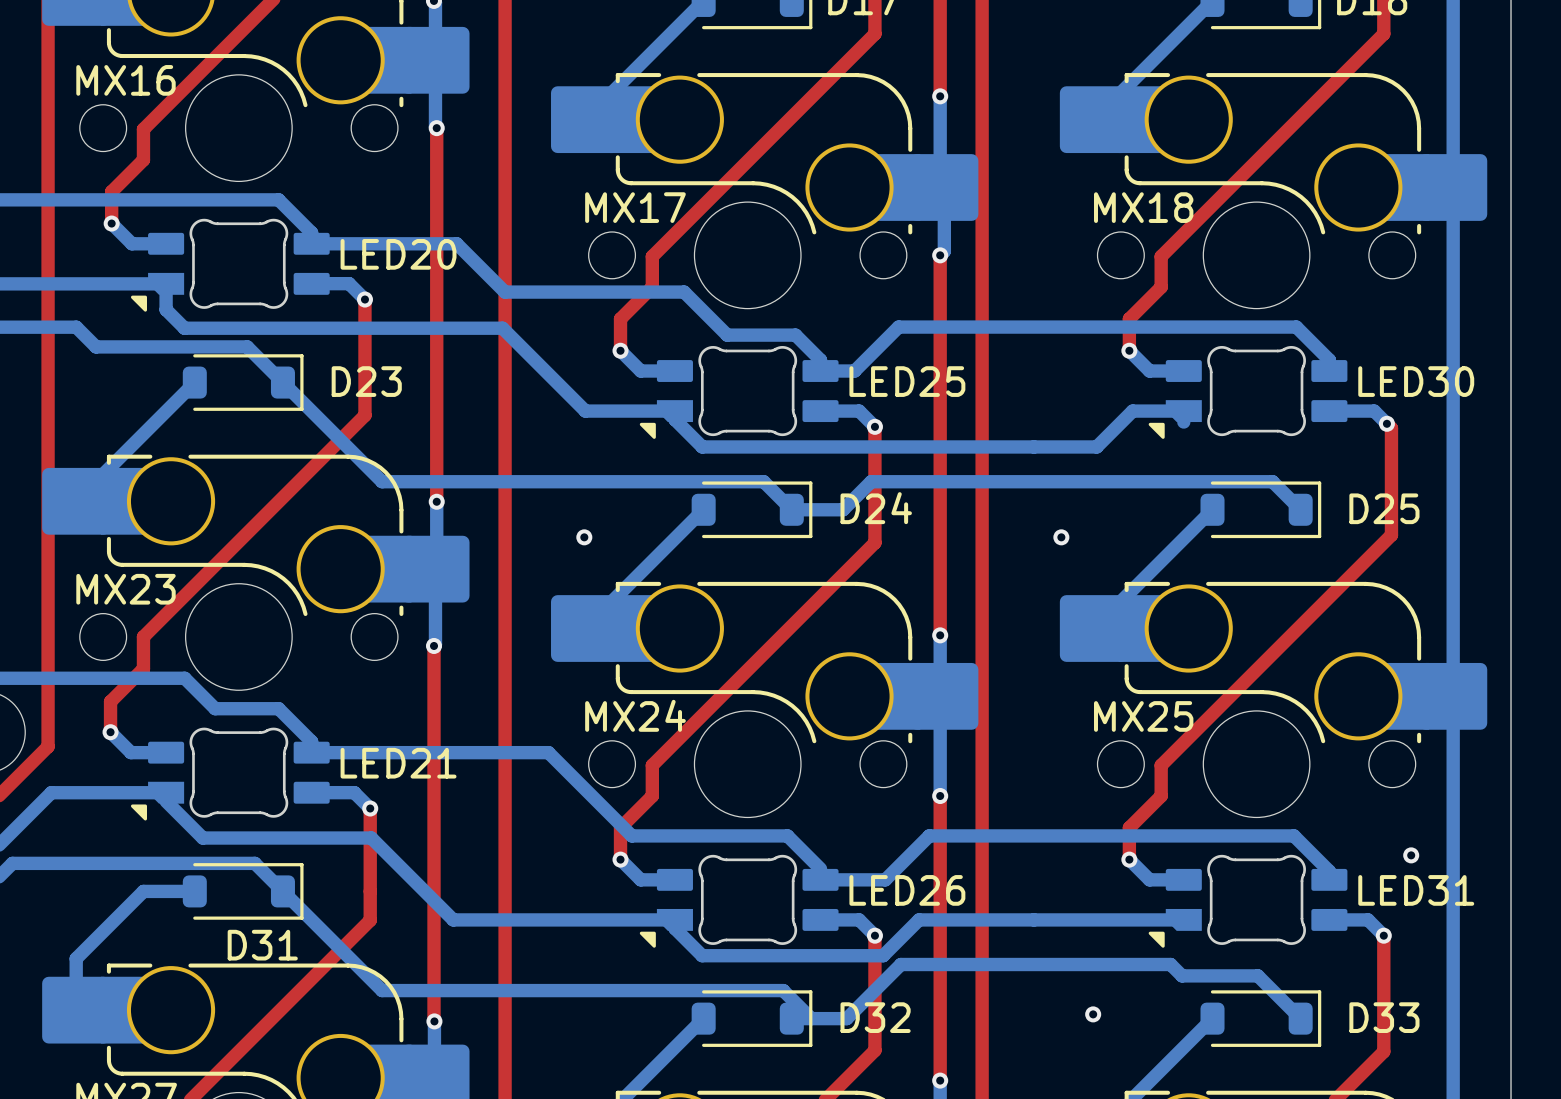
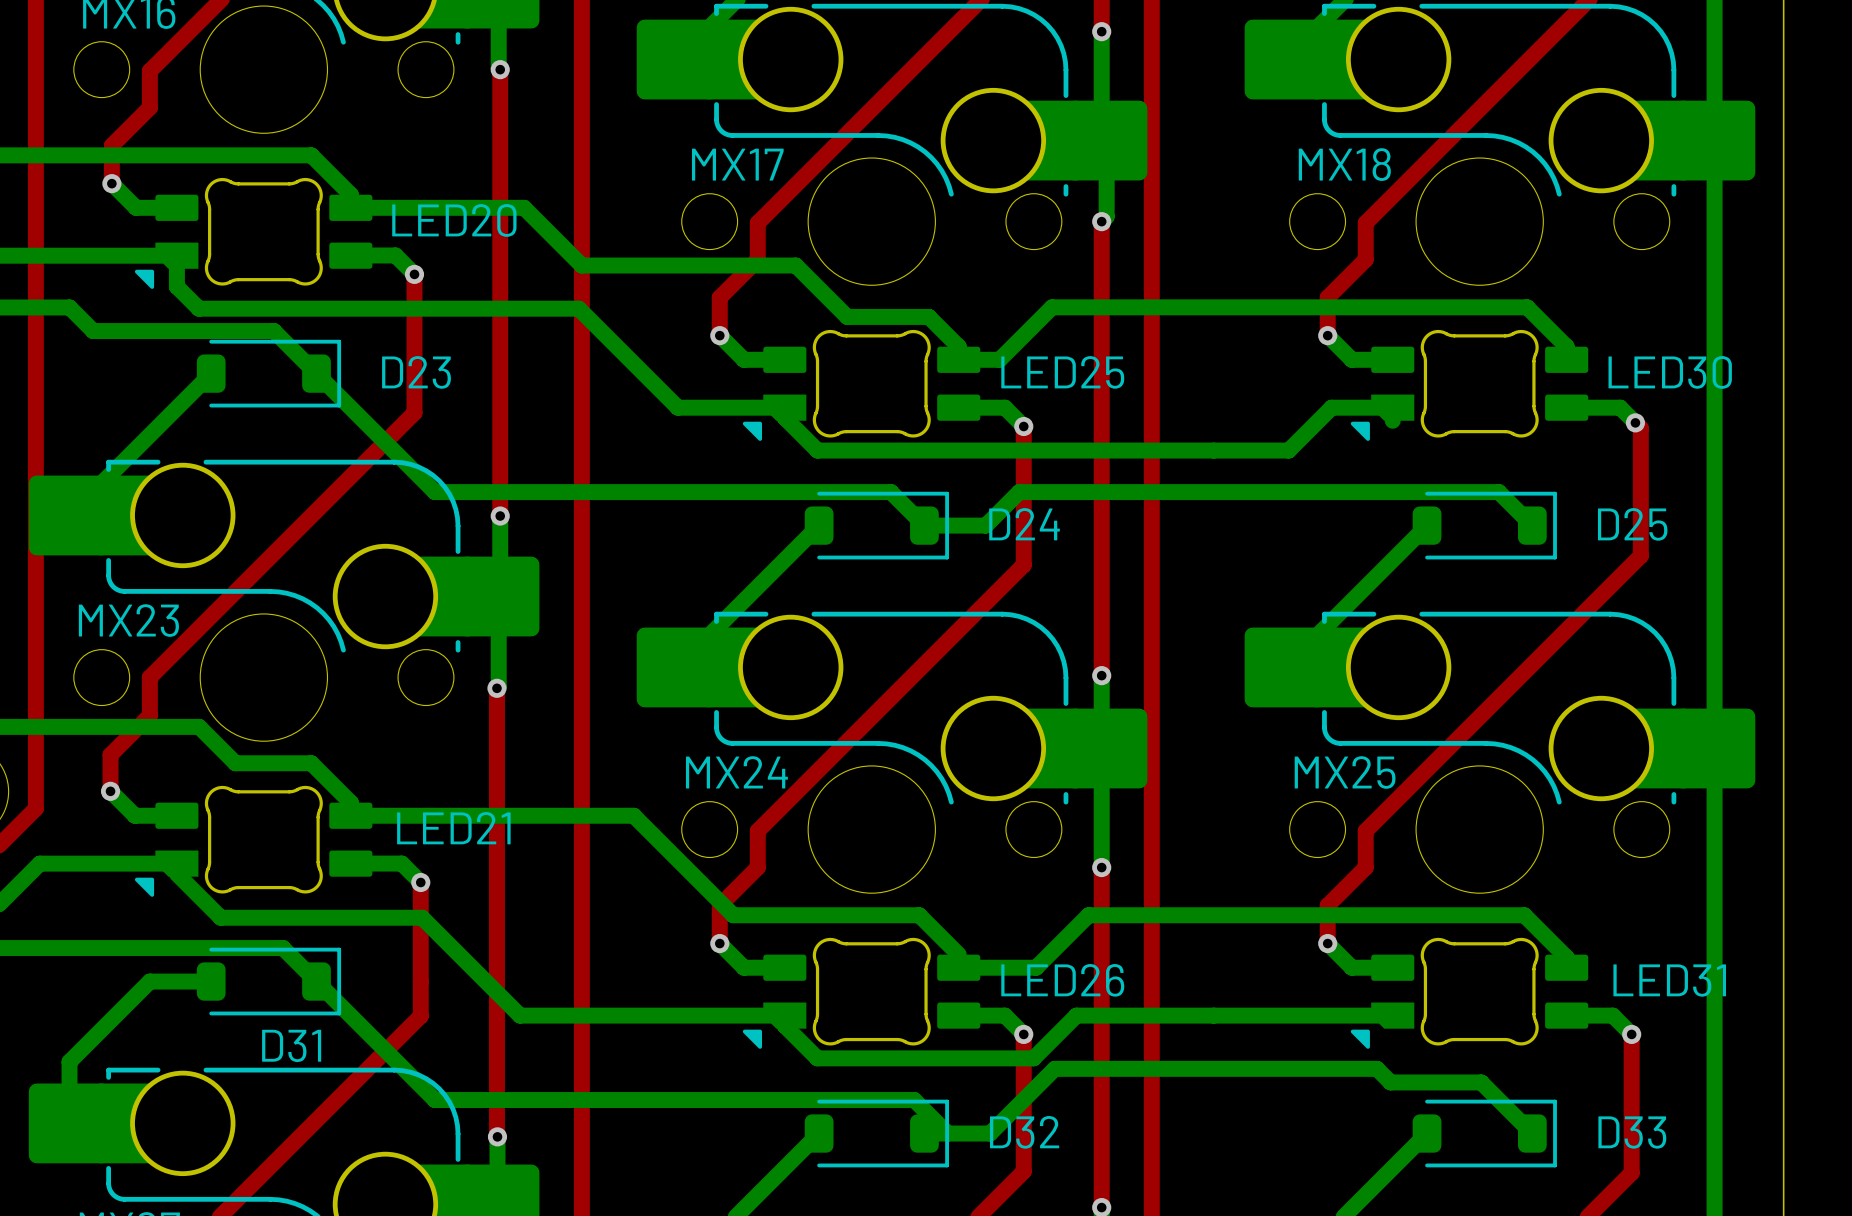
via: (584, 537) -> none
via: (1061, 537) -> none
via: (1411, 855) -> none
via: (1093, 1014) -> none

